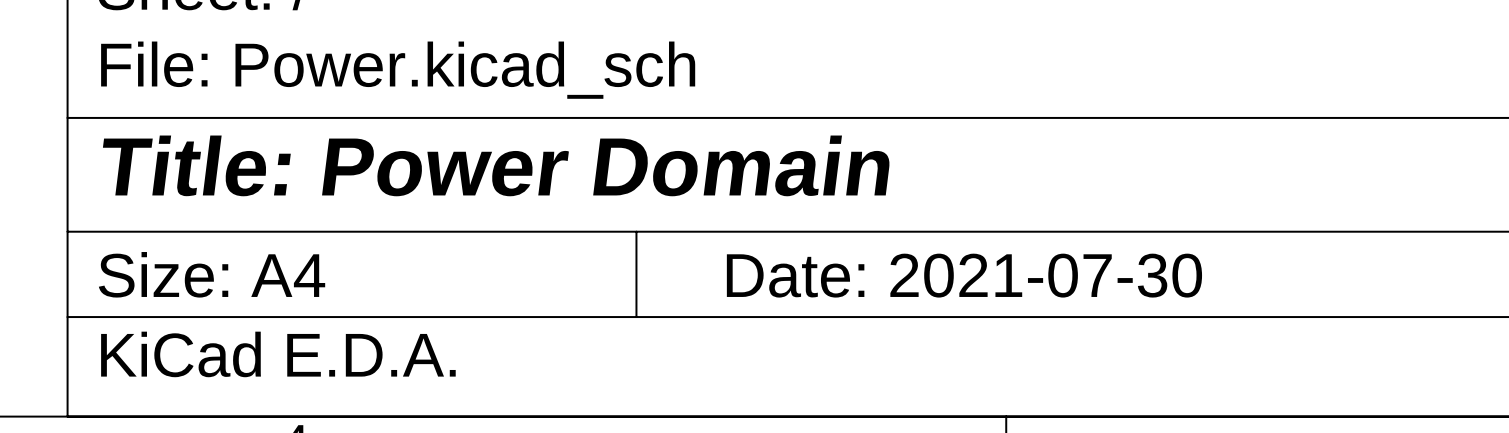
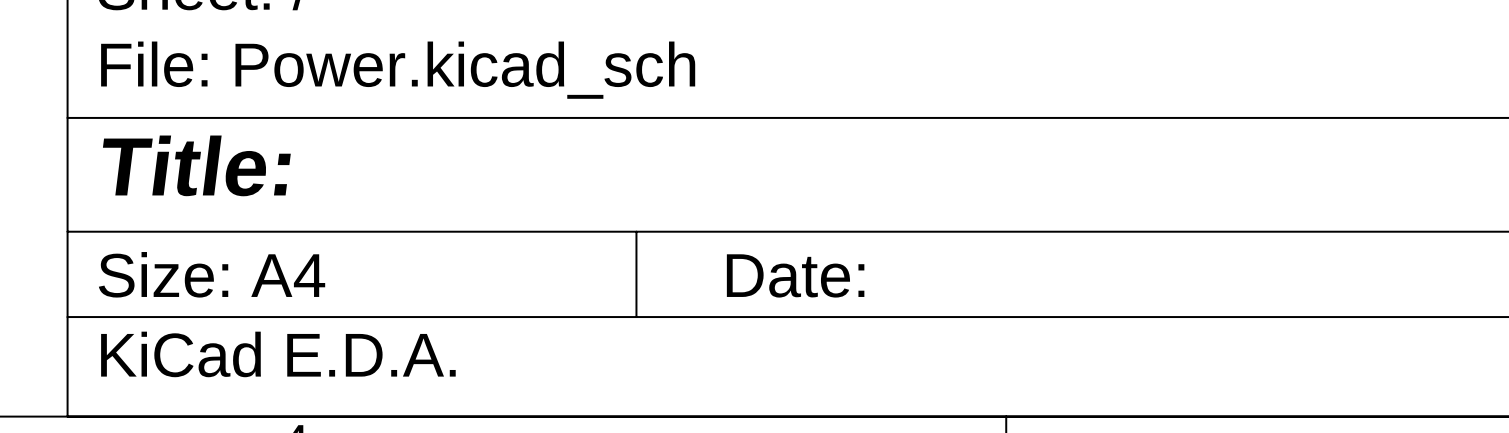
title block: Title: Power Domain (496, 165) -> Title: (196, 165)
title block: Date: 2021-07-30 (964, 275) -> Date: (795, 275)

